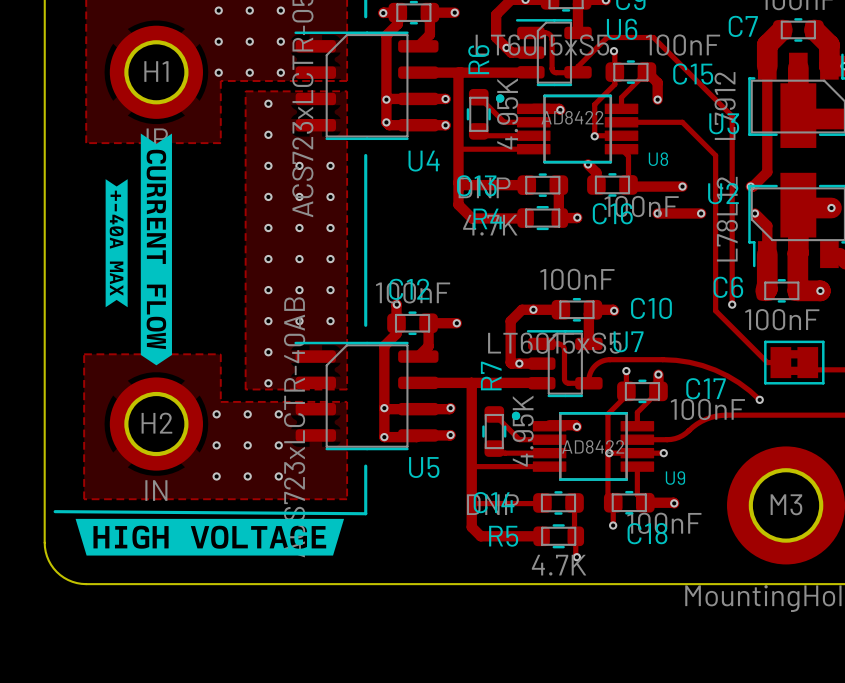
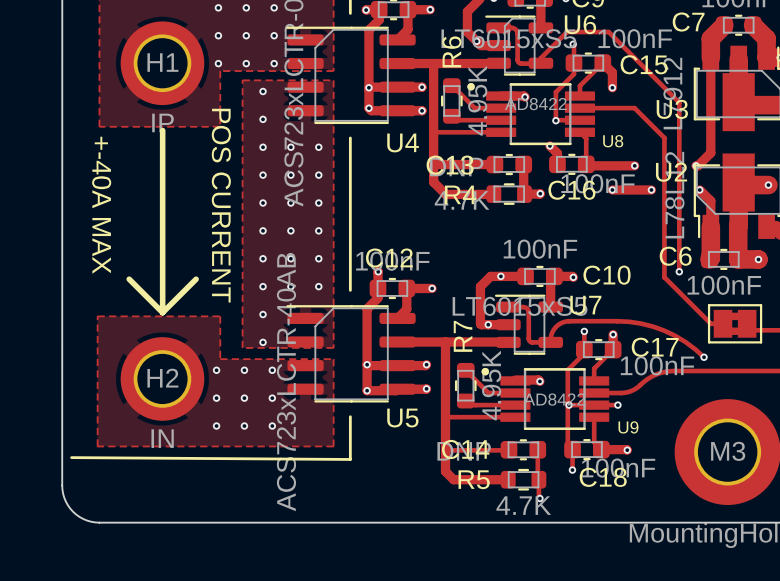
drawing: [105, 133, 172, 366] -> none
line: none -> (162, 130) (162, 312)
text: none -> +-40A MAX (101, 205)
text: none -> POS CURRENT (221, 205)
line: none -> (129, 279) (162, 312)
line: none -> (196, 279) (162, 312)
drawing: [75, 518, 345, 556] -> none

